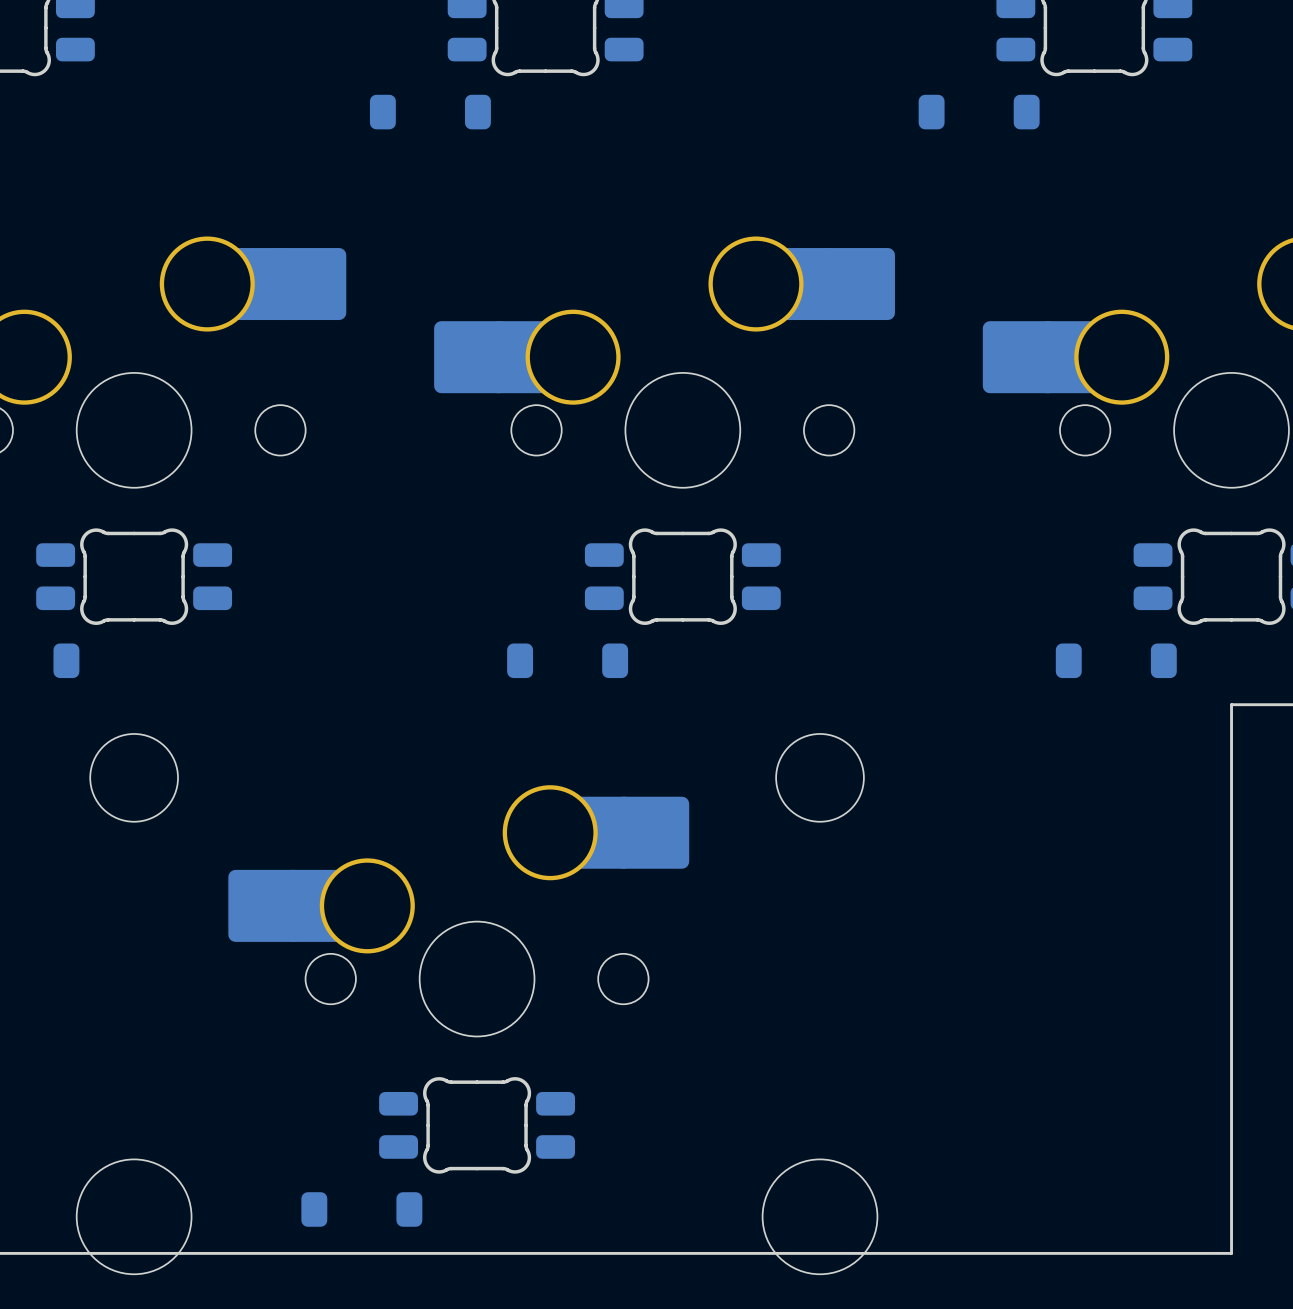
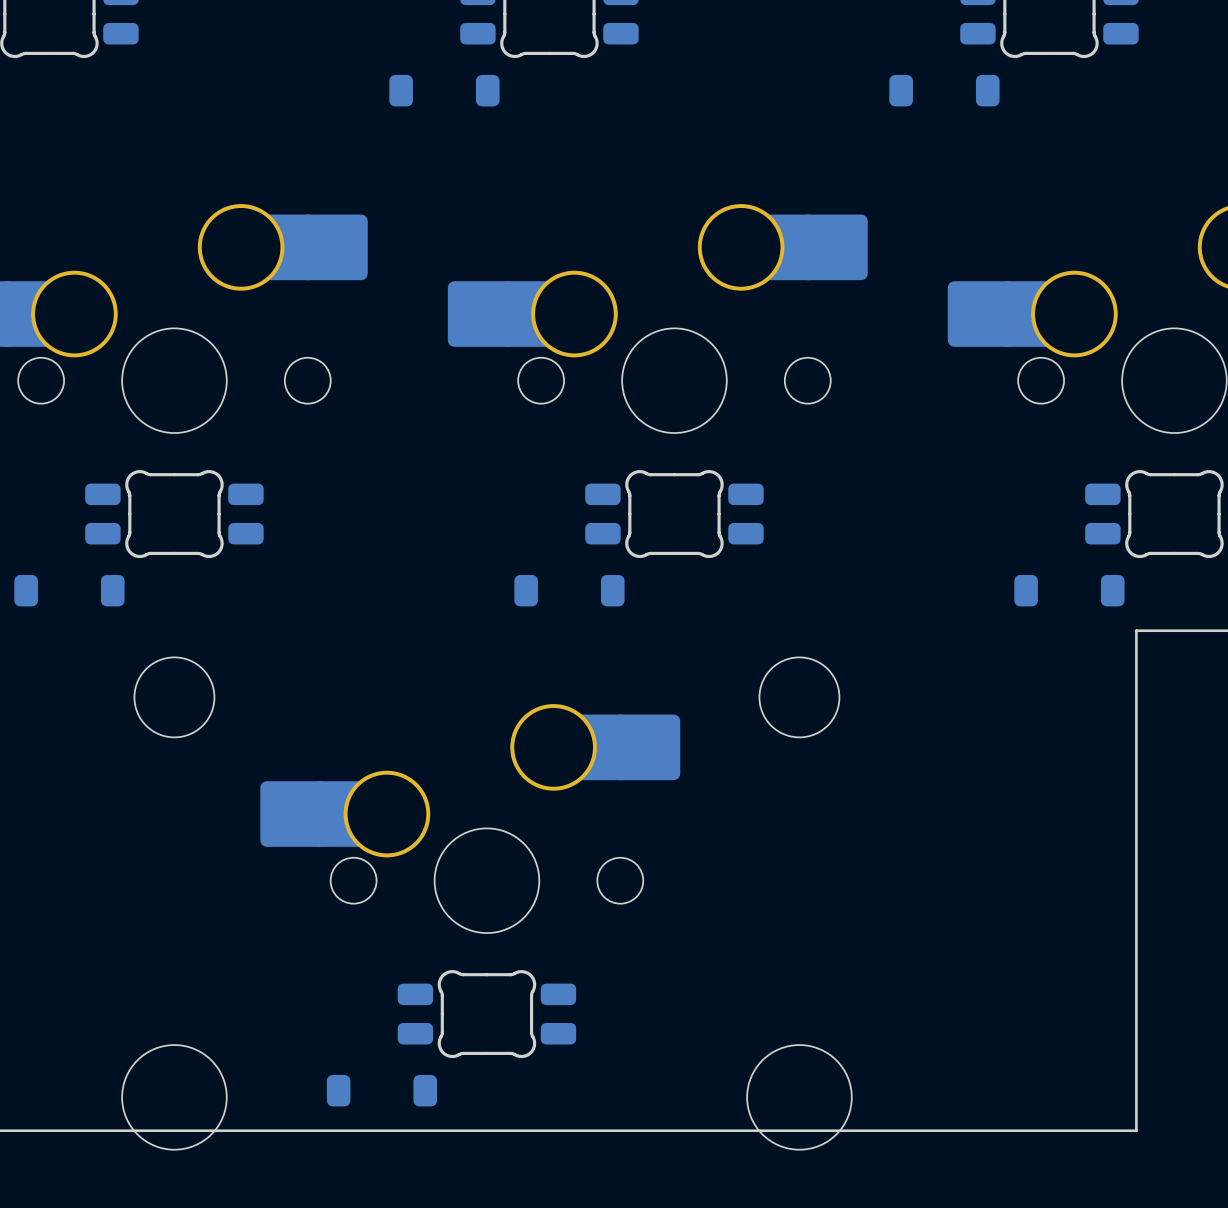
board edge: (1231, 704) (1231, 1253) (1189, 1253) -> (1174, 630) (1136, 630) (1136, 1130)

